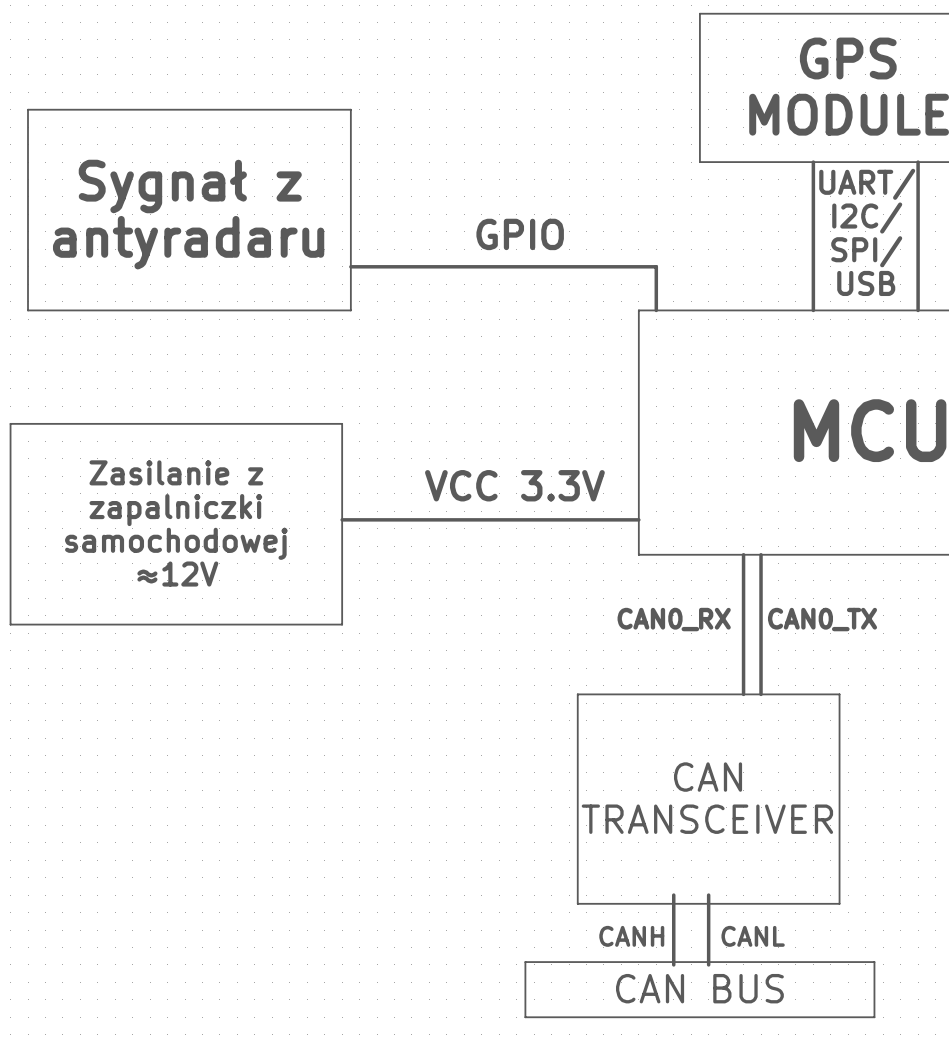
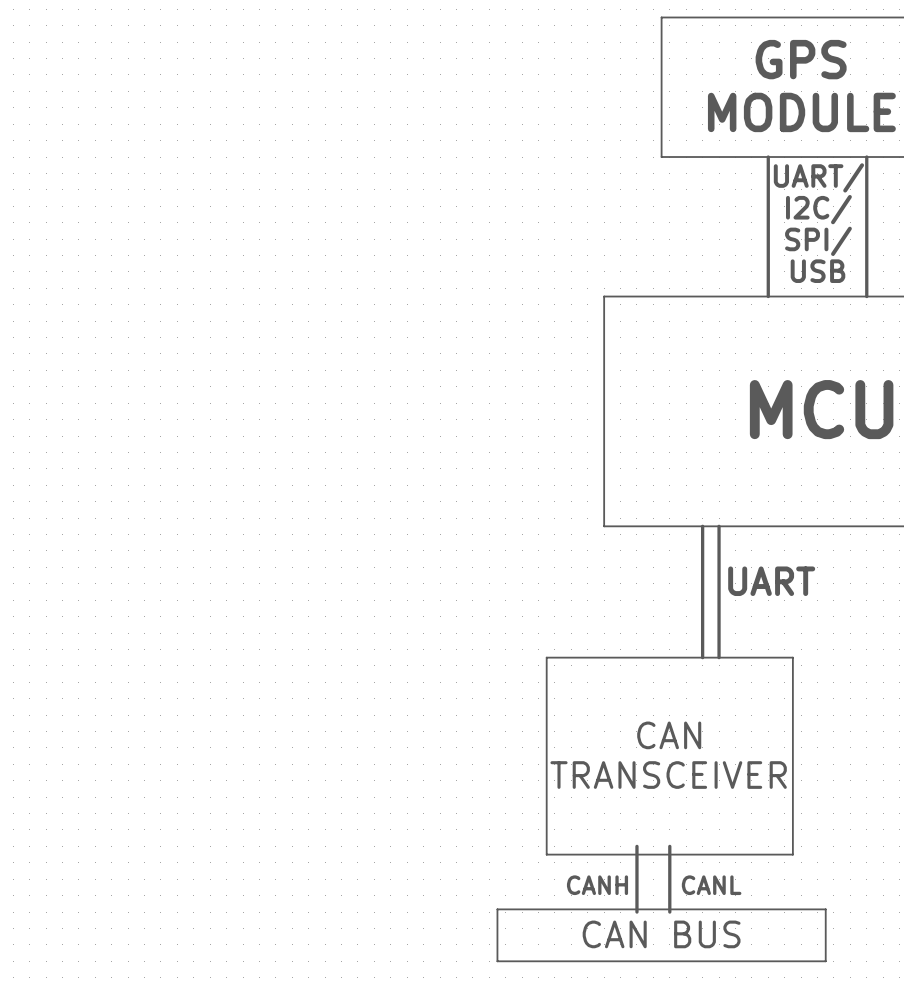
line: (28, 109) (350, 109) (350, 310) (28, 310) (28, 109) -> none
text: Sygnał z (190, 186) -> none
text: GPIO (520, 234) -> none
text: antyradaru (188, 242) -> none
line: (350, 266) (656, 266) (656, 310) -> none
line: (10, 423) (342, 423) (342, 624) (10, 624) (10, 423) -> none
text: Zasilanie z (176, 472) -> none
text: VCC 3.3V (514, 485) -> none
text: zapalniczki (175, 510) -> none
line: (342, 519) (638, 519) -> none
text: samochodowej (176, 543) -> none
text: ≈12V (177, 574) -> none
text: none -> UART (771, 581)
text: CAN0_RX (674, 619) -> none
text: CAN0_TX (822, 619) -> none

